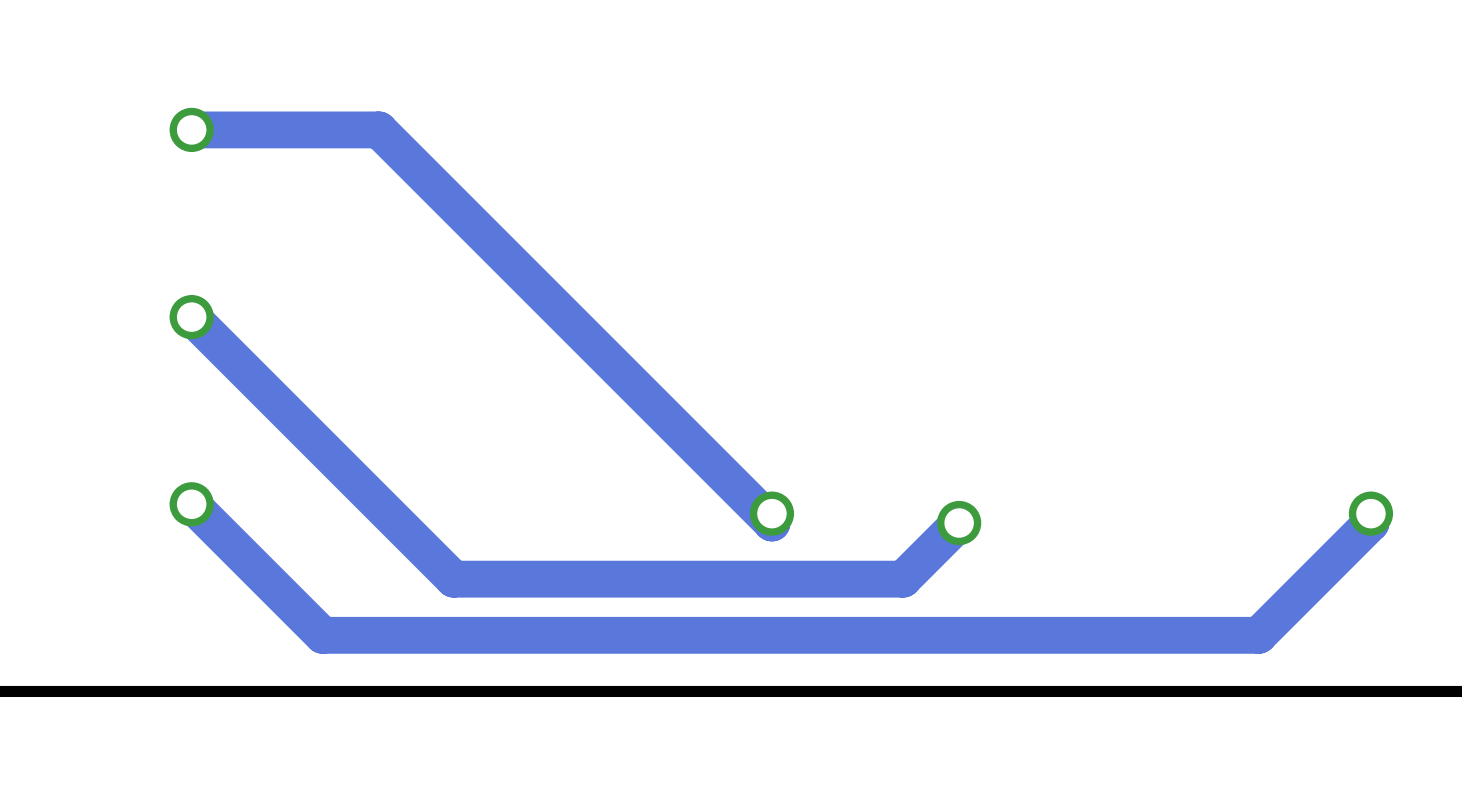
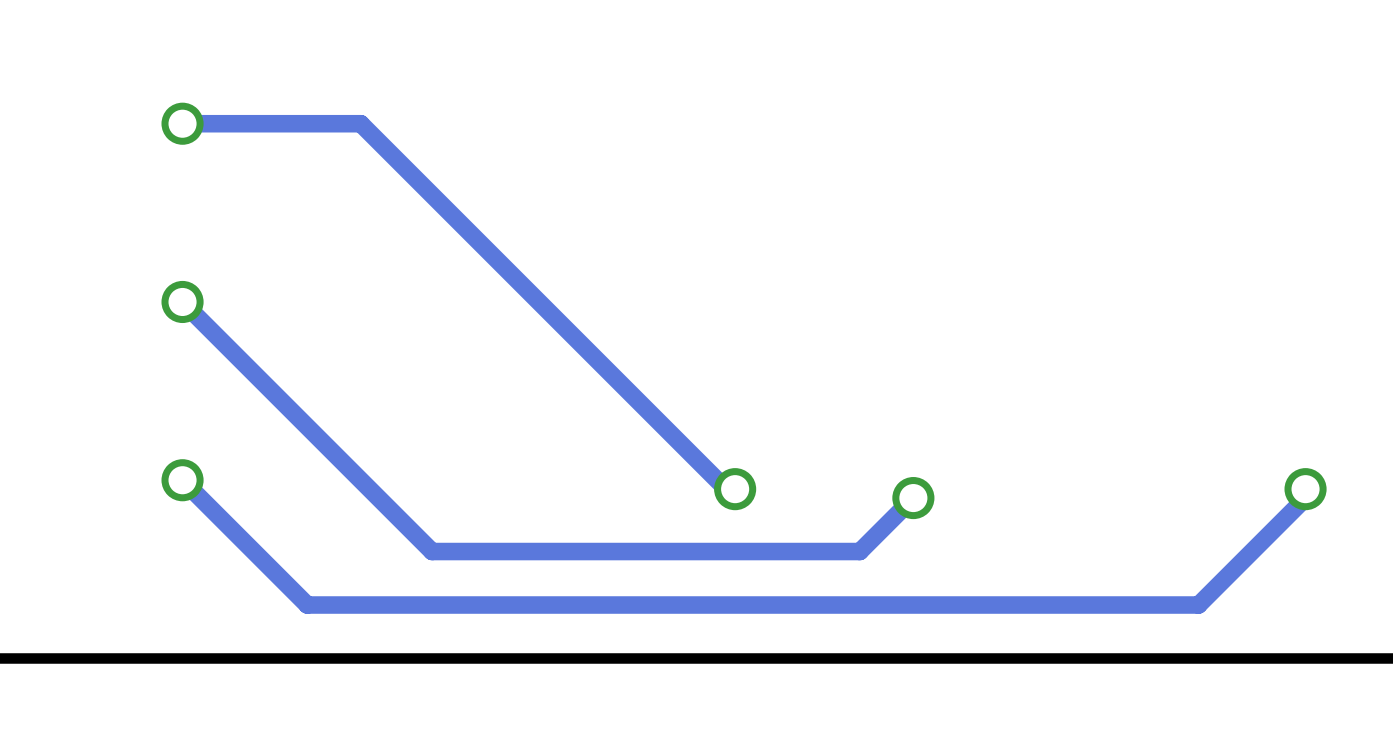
track width: thick (191, 129) (378, 129) (771, 523) (771, 513) -> thin (182, 123) (360, 123) (735, 498) (735, 489)
track width: thick (191, 317) (453, 579) (902, 579) (959, 523) -> thin (182, 301) (432, 551) (859, 551) (913, 498)
track width: thick (191, 504) (322, 635) (1258, 635) (1370, 523) (1370, 513) -> thin (182, 480) (307, 605) (1198, 605) (1305, 498) (1305, 489)

